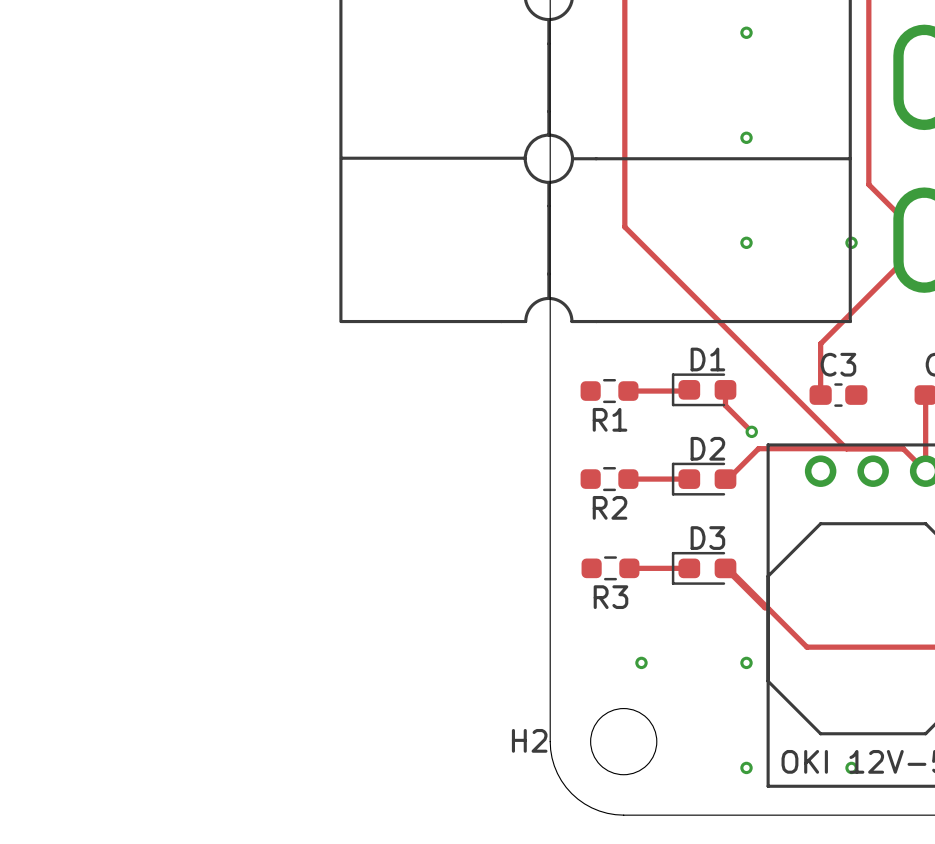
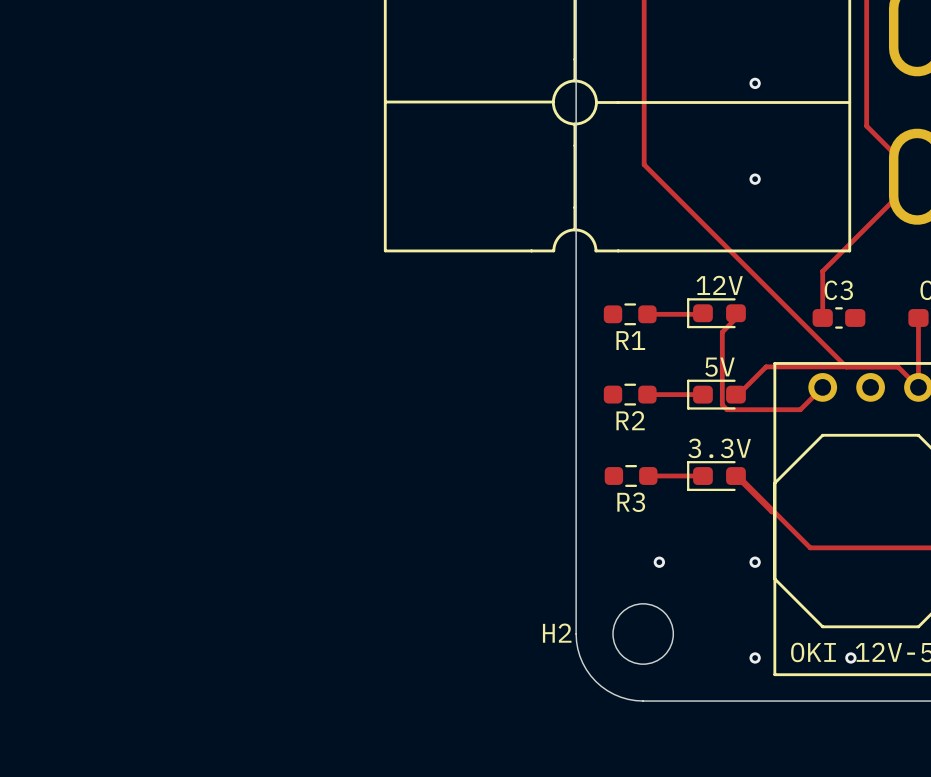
via: (851, 242) -> none
D1 name: D1 (707, 359) -> 12V (719, 285)
track: (725, 389) (725, 405) (751, 431) -> none
track: none -> (738, 316) (722, 332) (722, 404) (727, 409) (800, 409) (822, 387)
via: (751, 431) -> none
D2 name: D2 (707, 448) -> 5V (719, 367)
D3 name: D3 (707, 538) -> 3.3V (719, 448)

